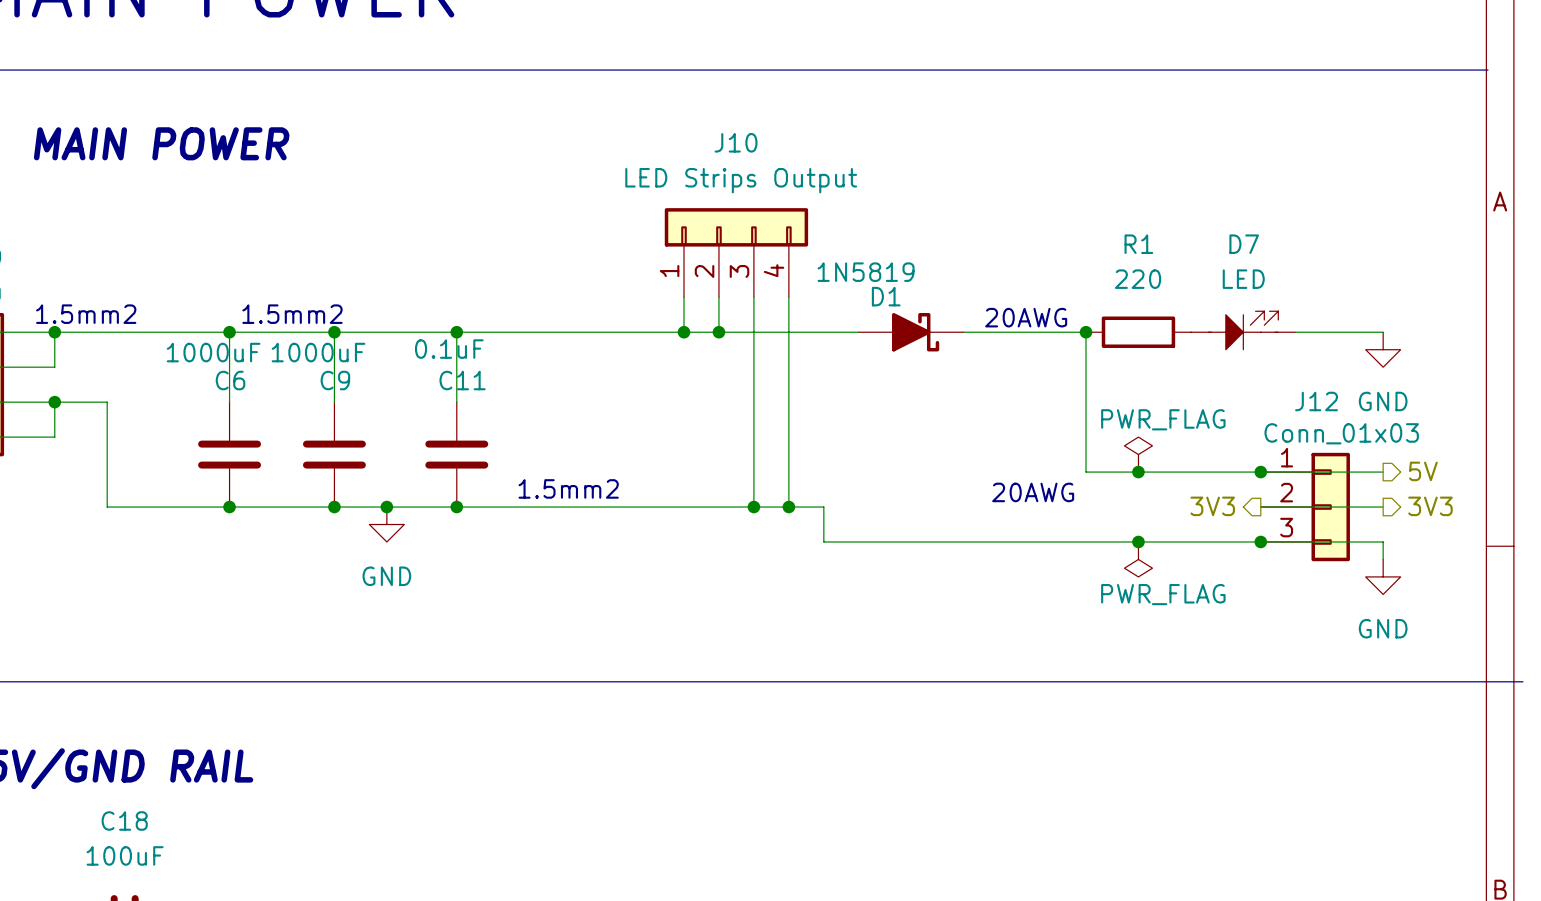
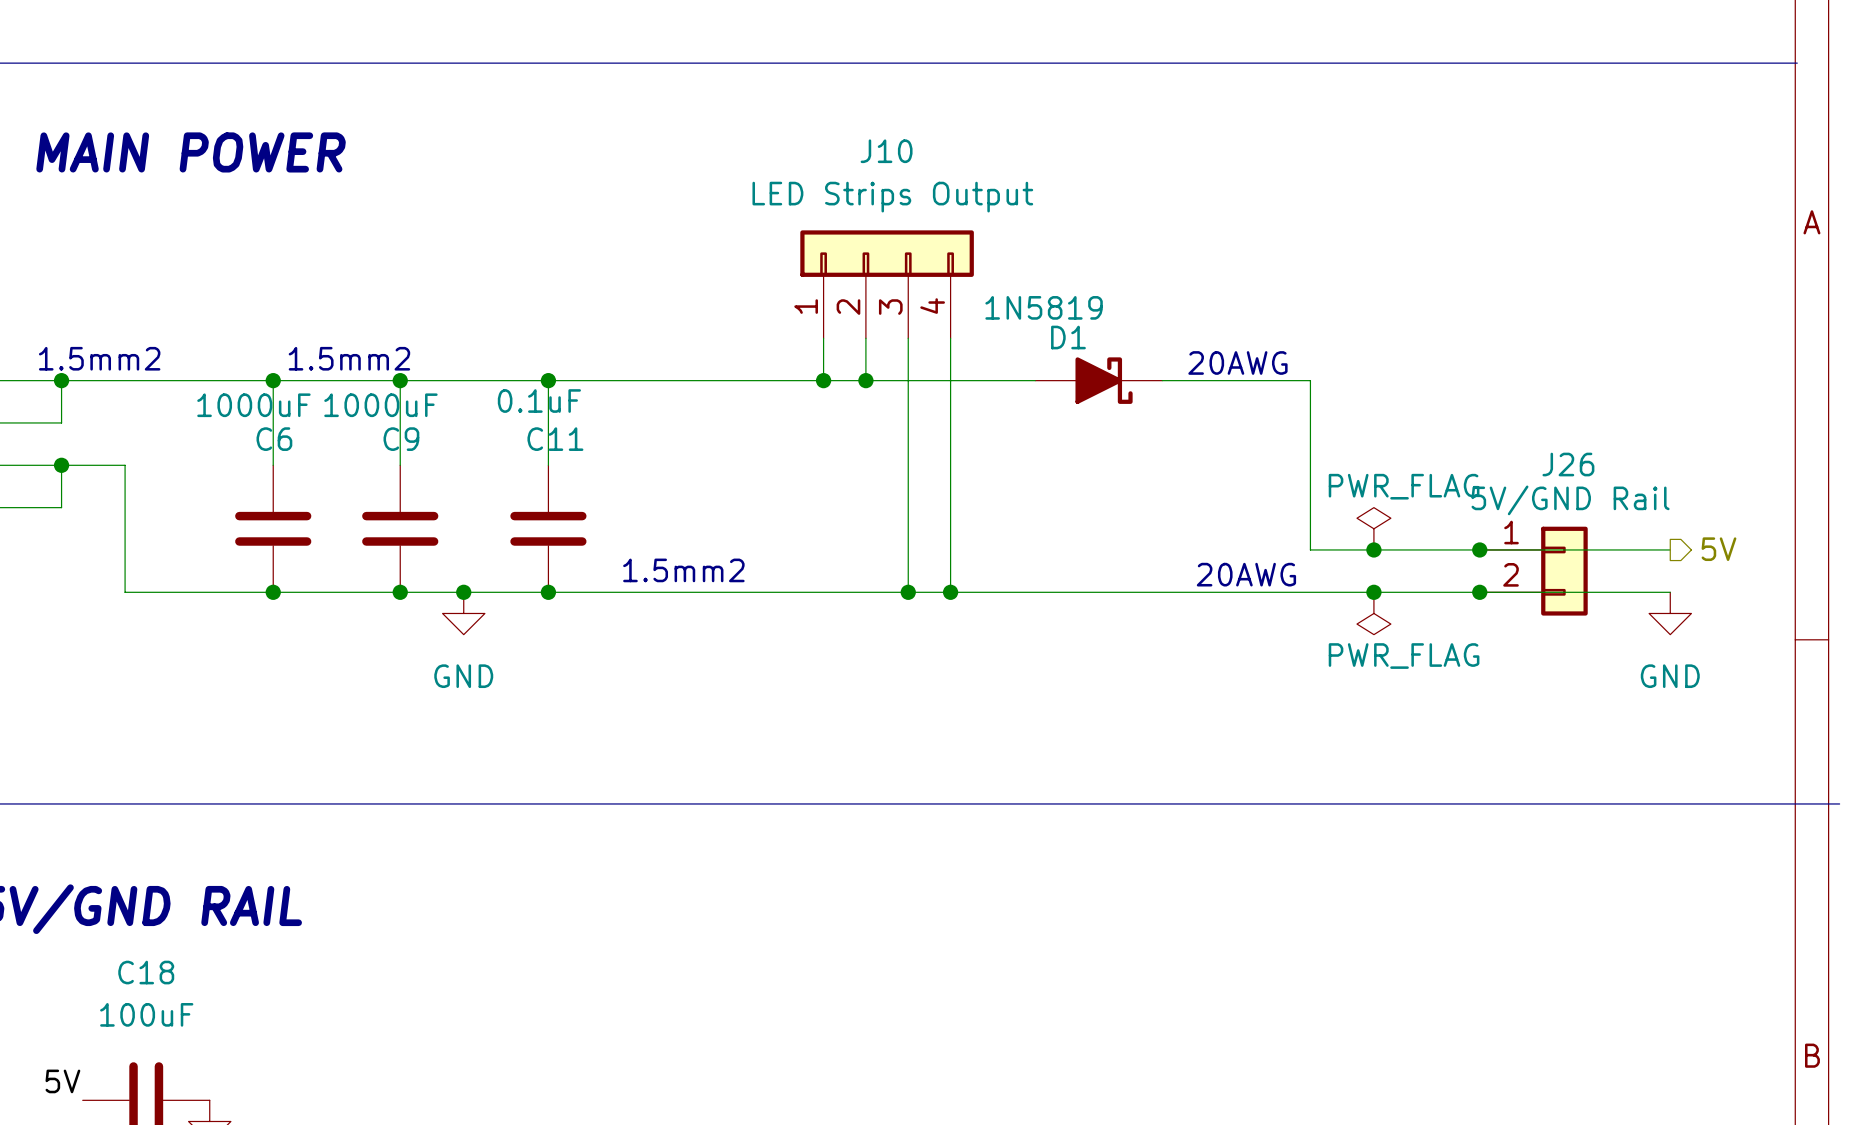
D7: LED (1243, 330) -> none
junction: (1086, 332) -> none
R1: 220 (1138, 332) -> none
wire: (1295, 332) (1383, 332) -> none
power symbol: GND (1383, 349) -> none
junction: none -> (1479, 549)
junction: (1260, 472) -> none
J26: none -> 5V/GND Rail (1533, 571)
hierarchical label: 3V3 (1212, 506) -> none
hierarchical label: 3V3 (1430, 506) -> none
wire: (823, 507) (823, 541) (1383, 541) (1383, 559) -> (992, 592) (1522, 592)
junction: none -> (1479, 592)
J12: Conn_01x03 (1305, 507) -> none
junction position: (1138, 541) -> (1373, 592)
junction: (1260, 541) -> none
power symbol position: PWR_FLAG (1138, 559) -> PWR_FLAG (1373, 613)
power symbol position: GND (1383, 576) -> GND (1670, 613)

